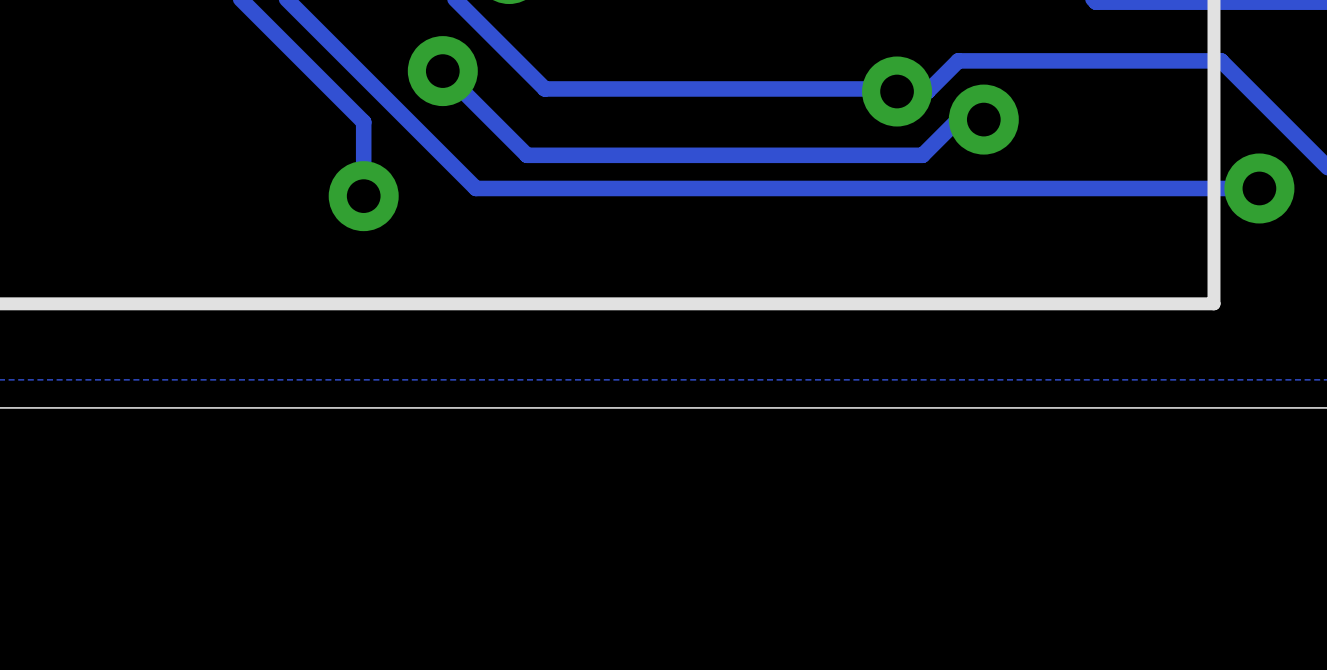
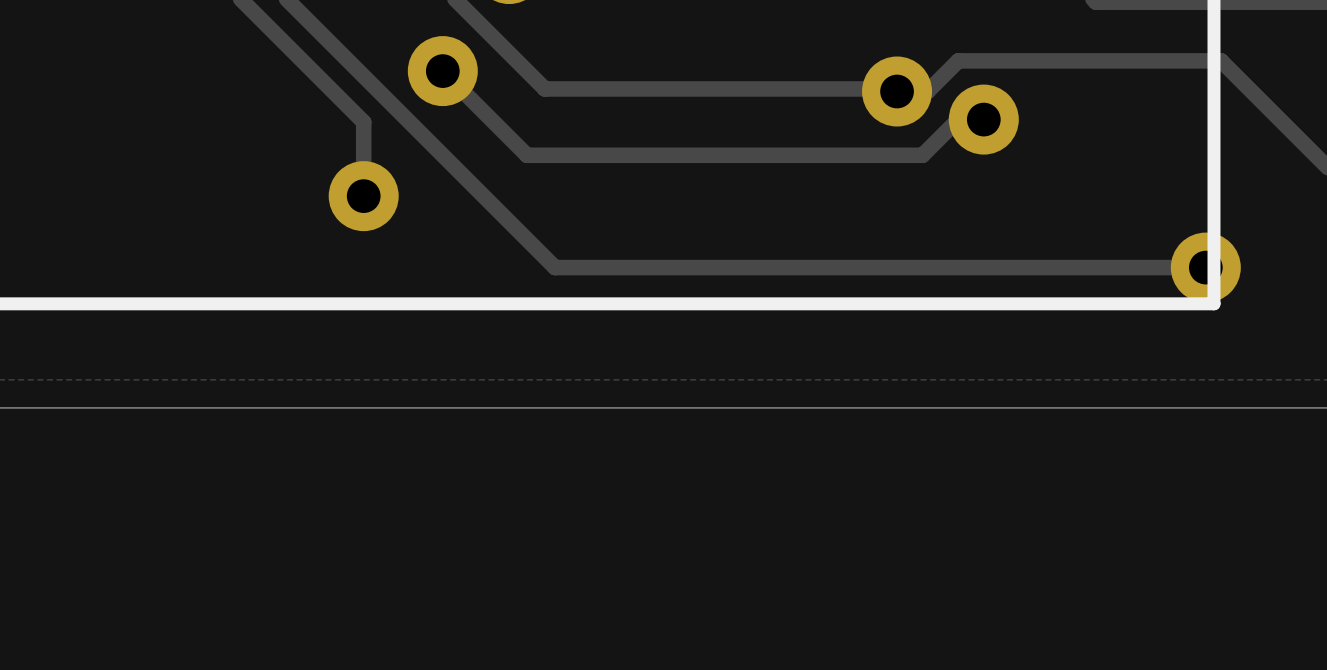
track: (1259, 188) (475, 188) -> (1205, 267) (555, 267) (475, 188)
via position: (1259, 188) -> (1205, 267)

